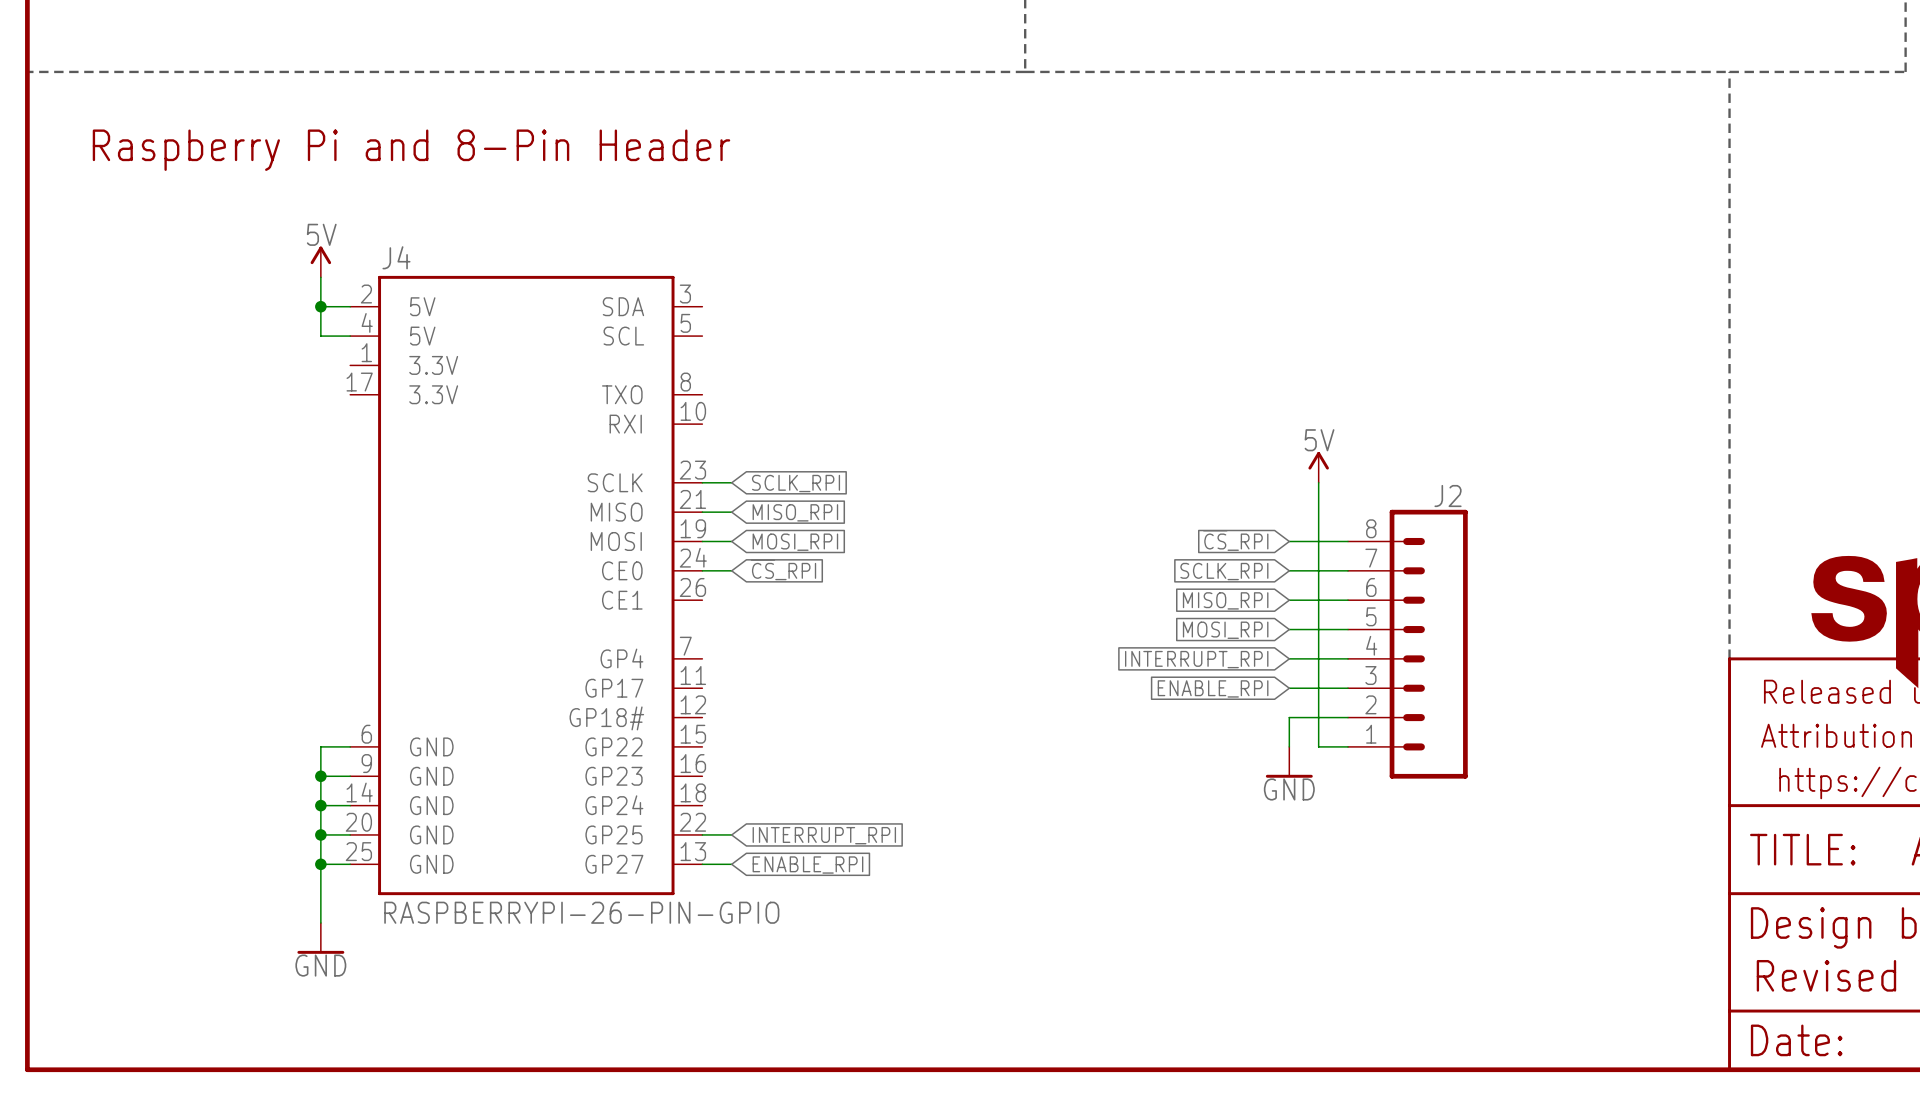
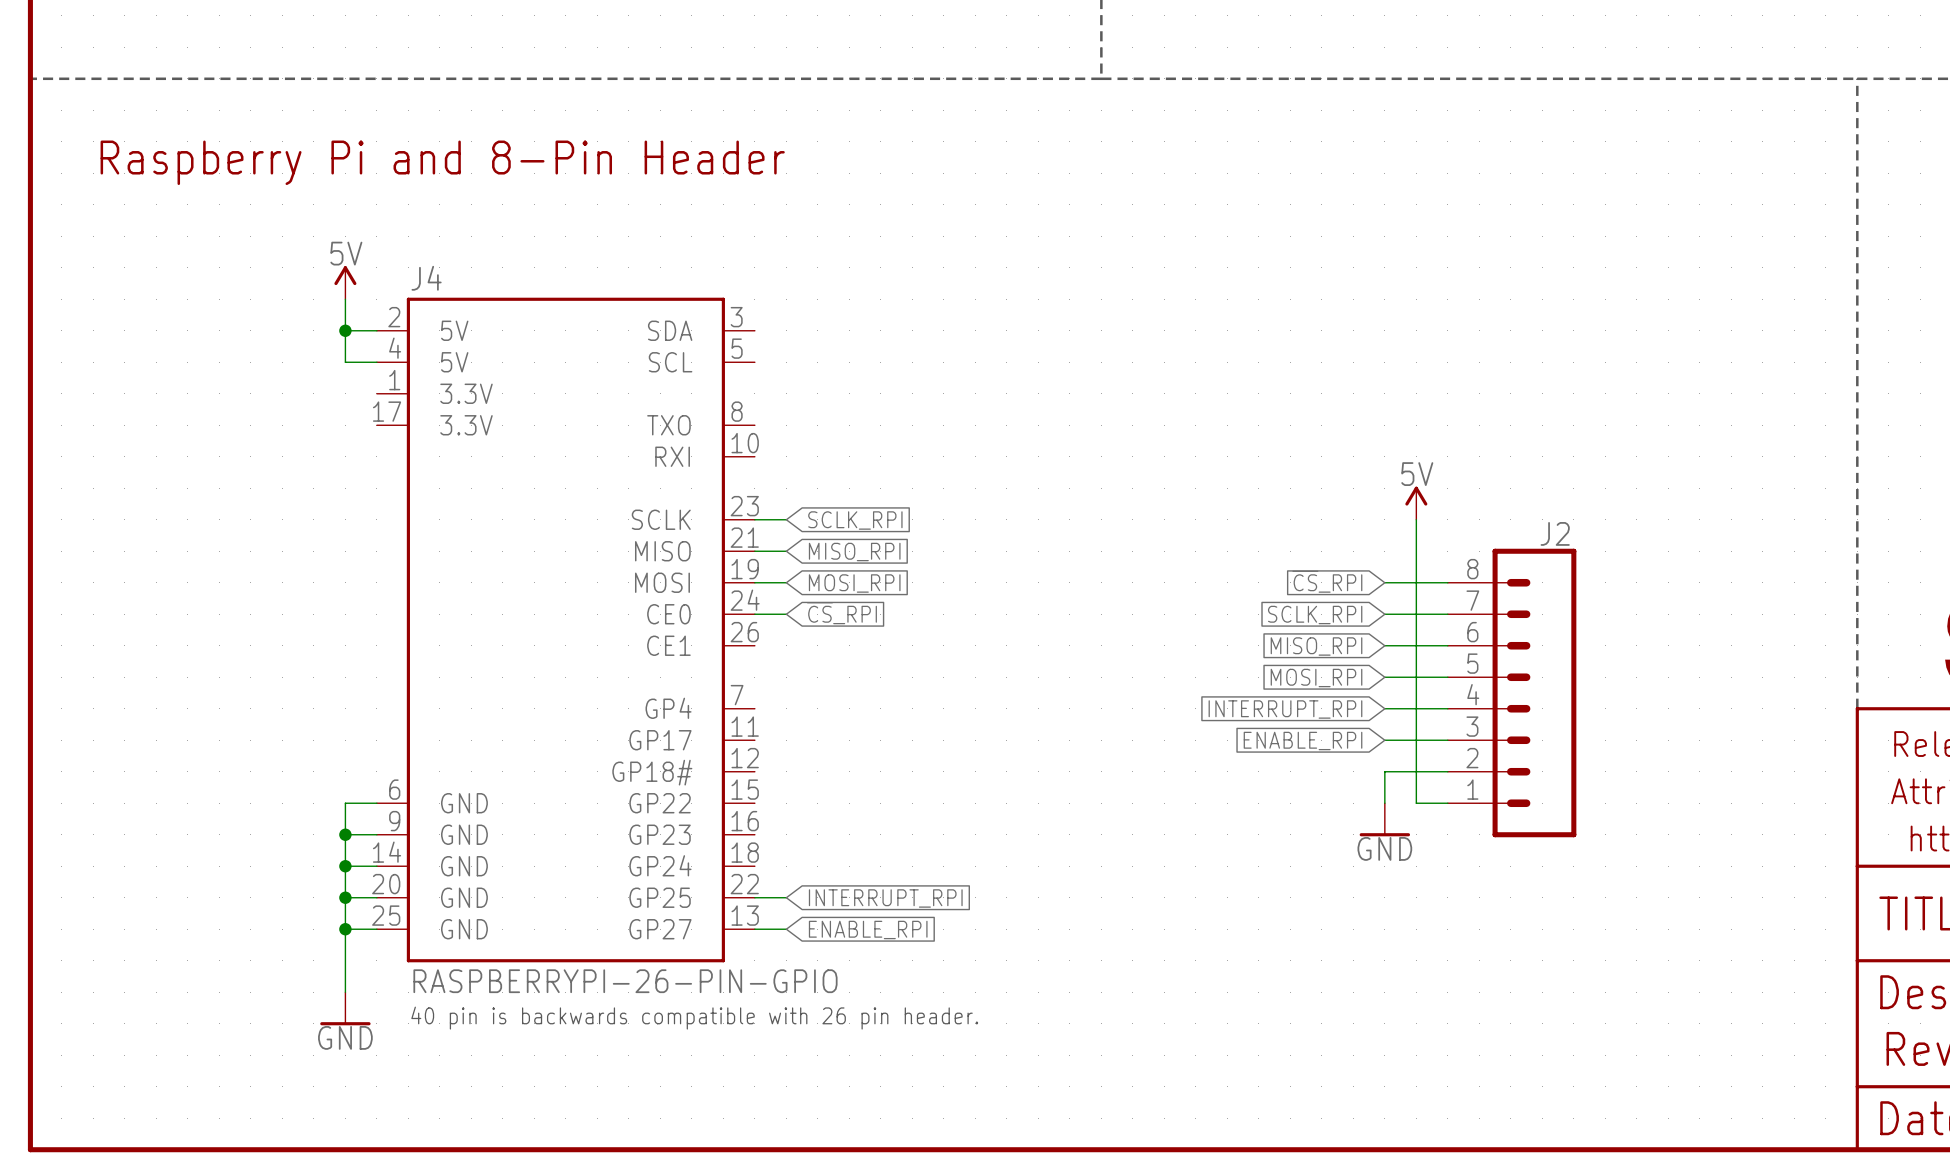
text: none -> 40 pin is backwards compatible with 26 pin header. (694, 1018)

